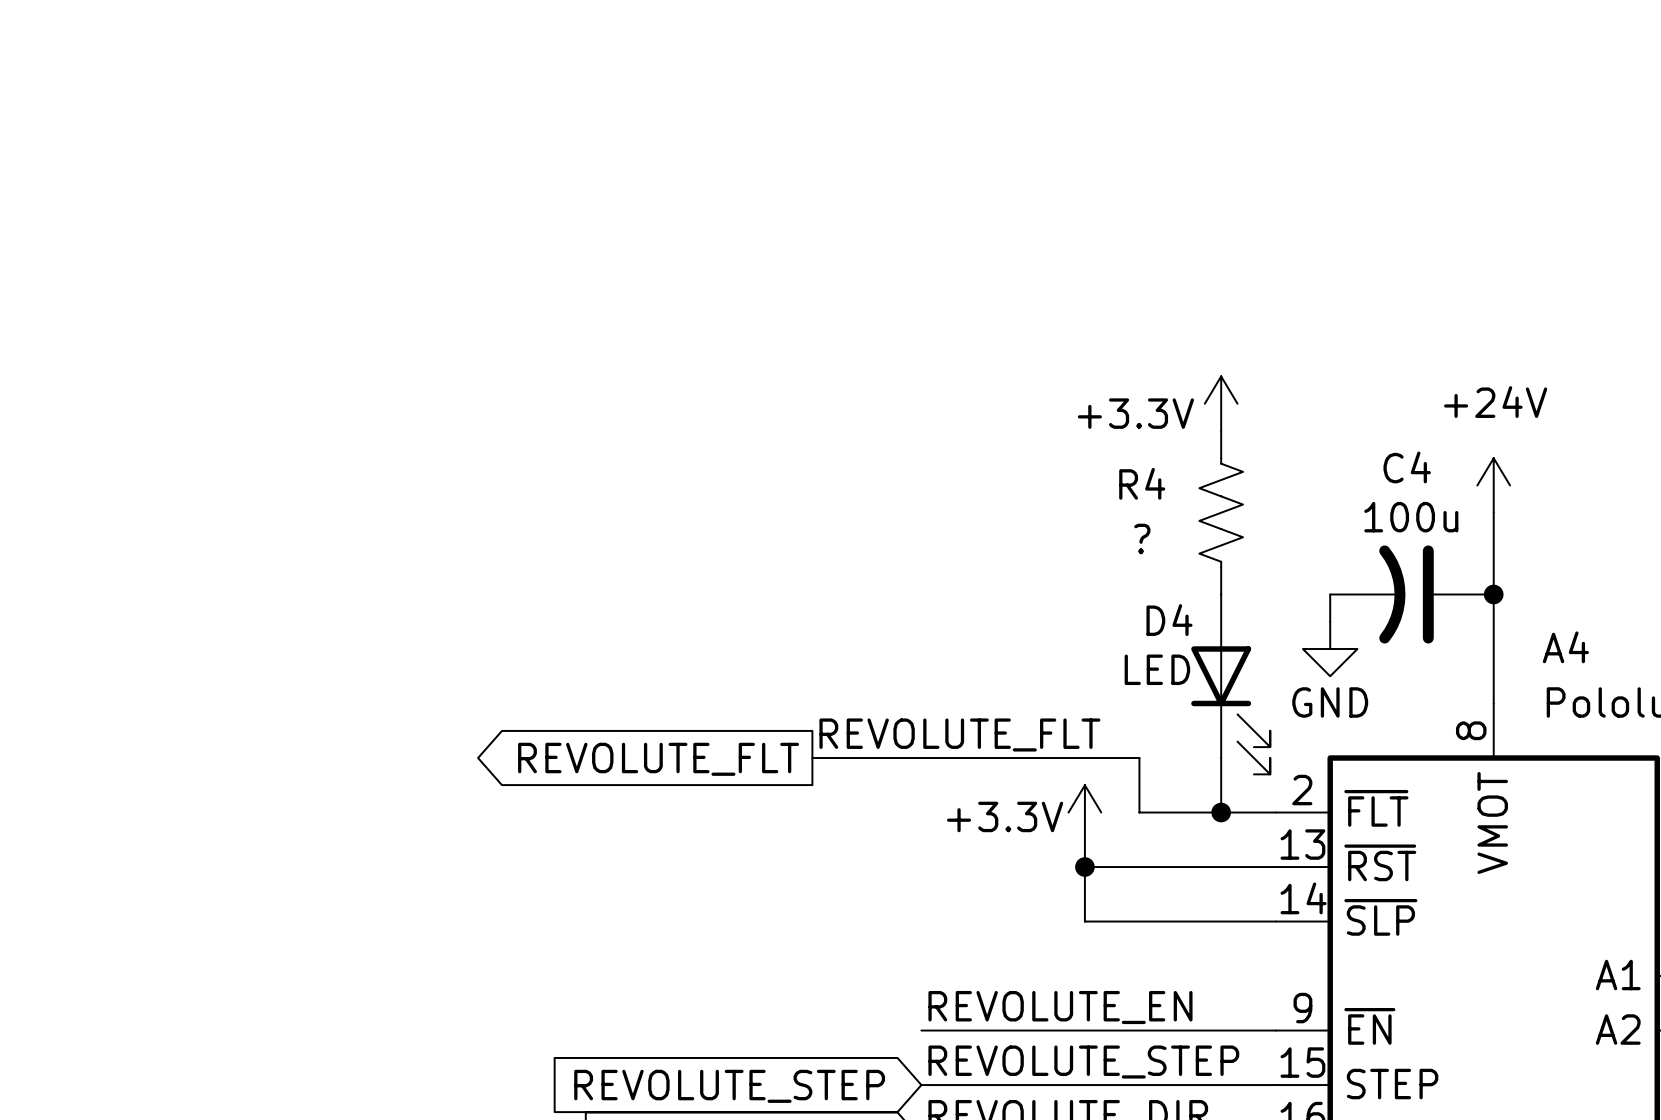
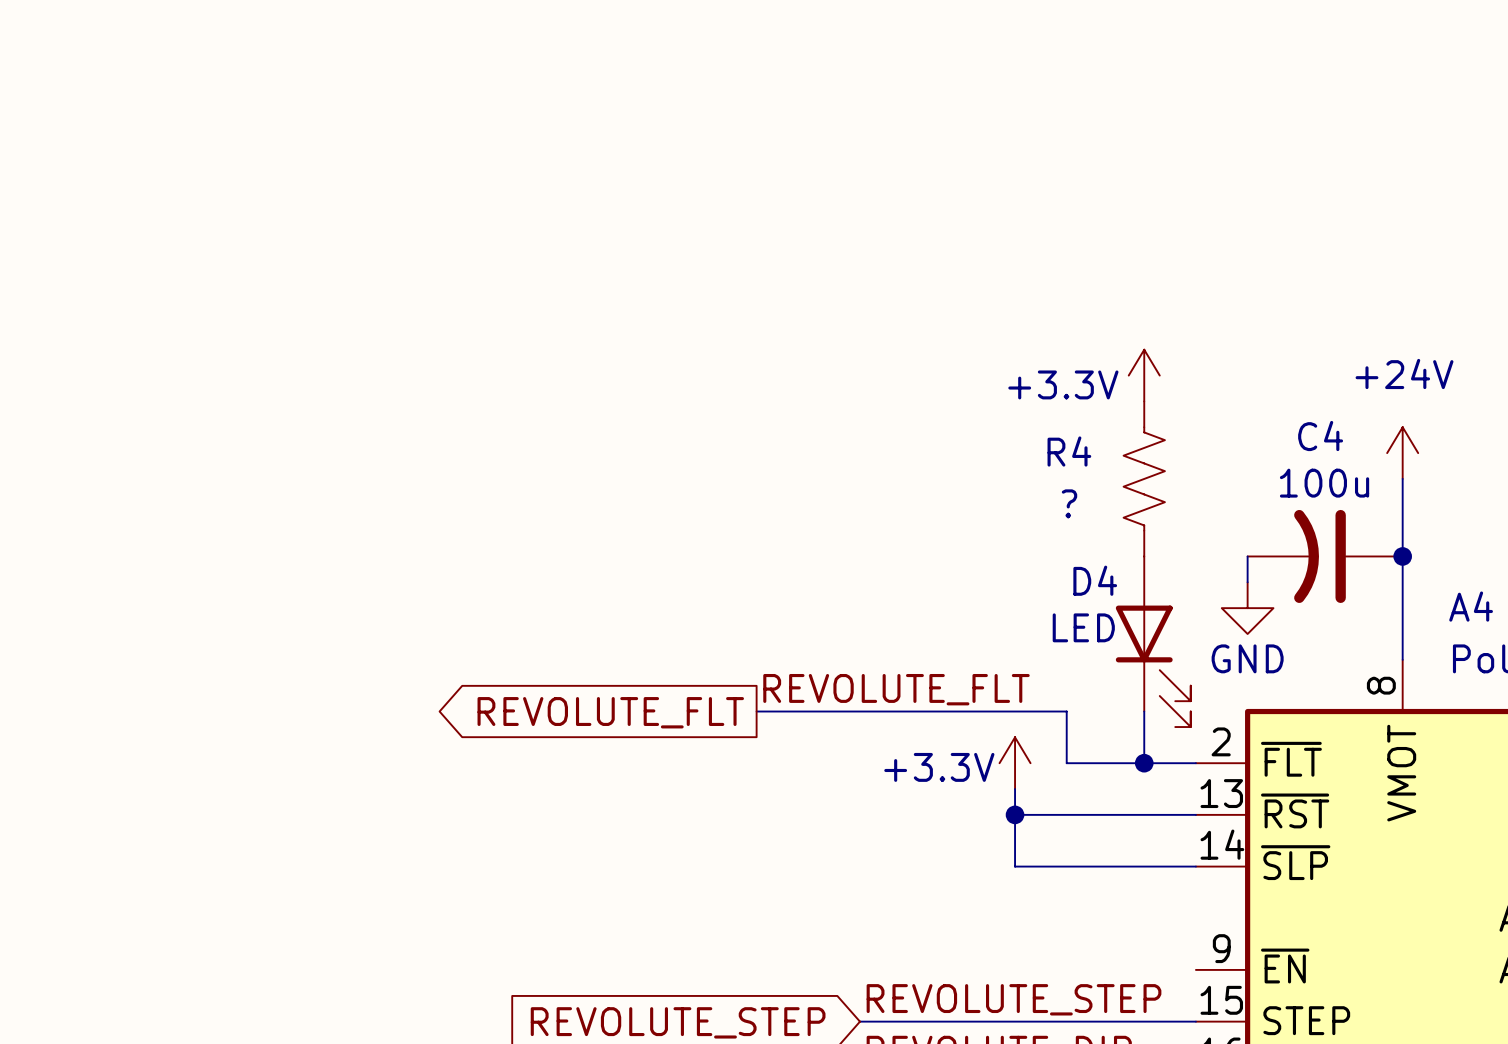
label: REVOLUTE_EN (1060, 1007) -> none
wire: (921, 1030) (1275, 1030) -> none

